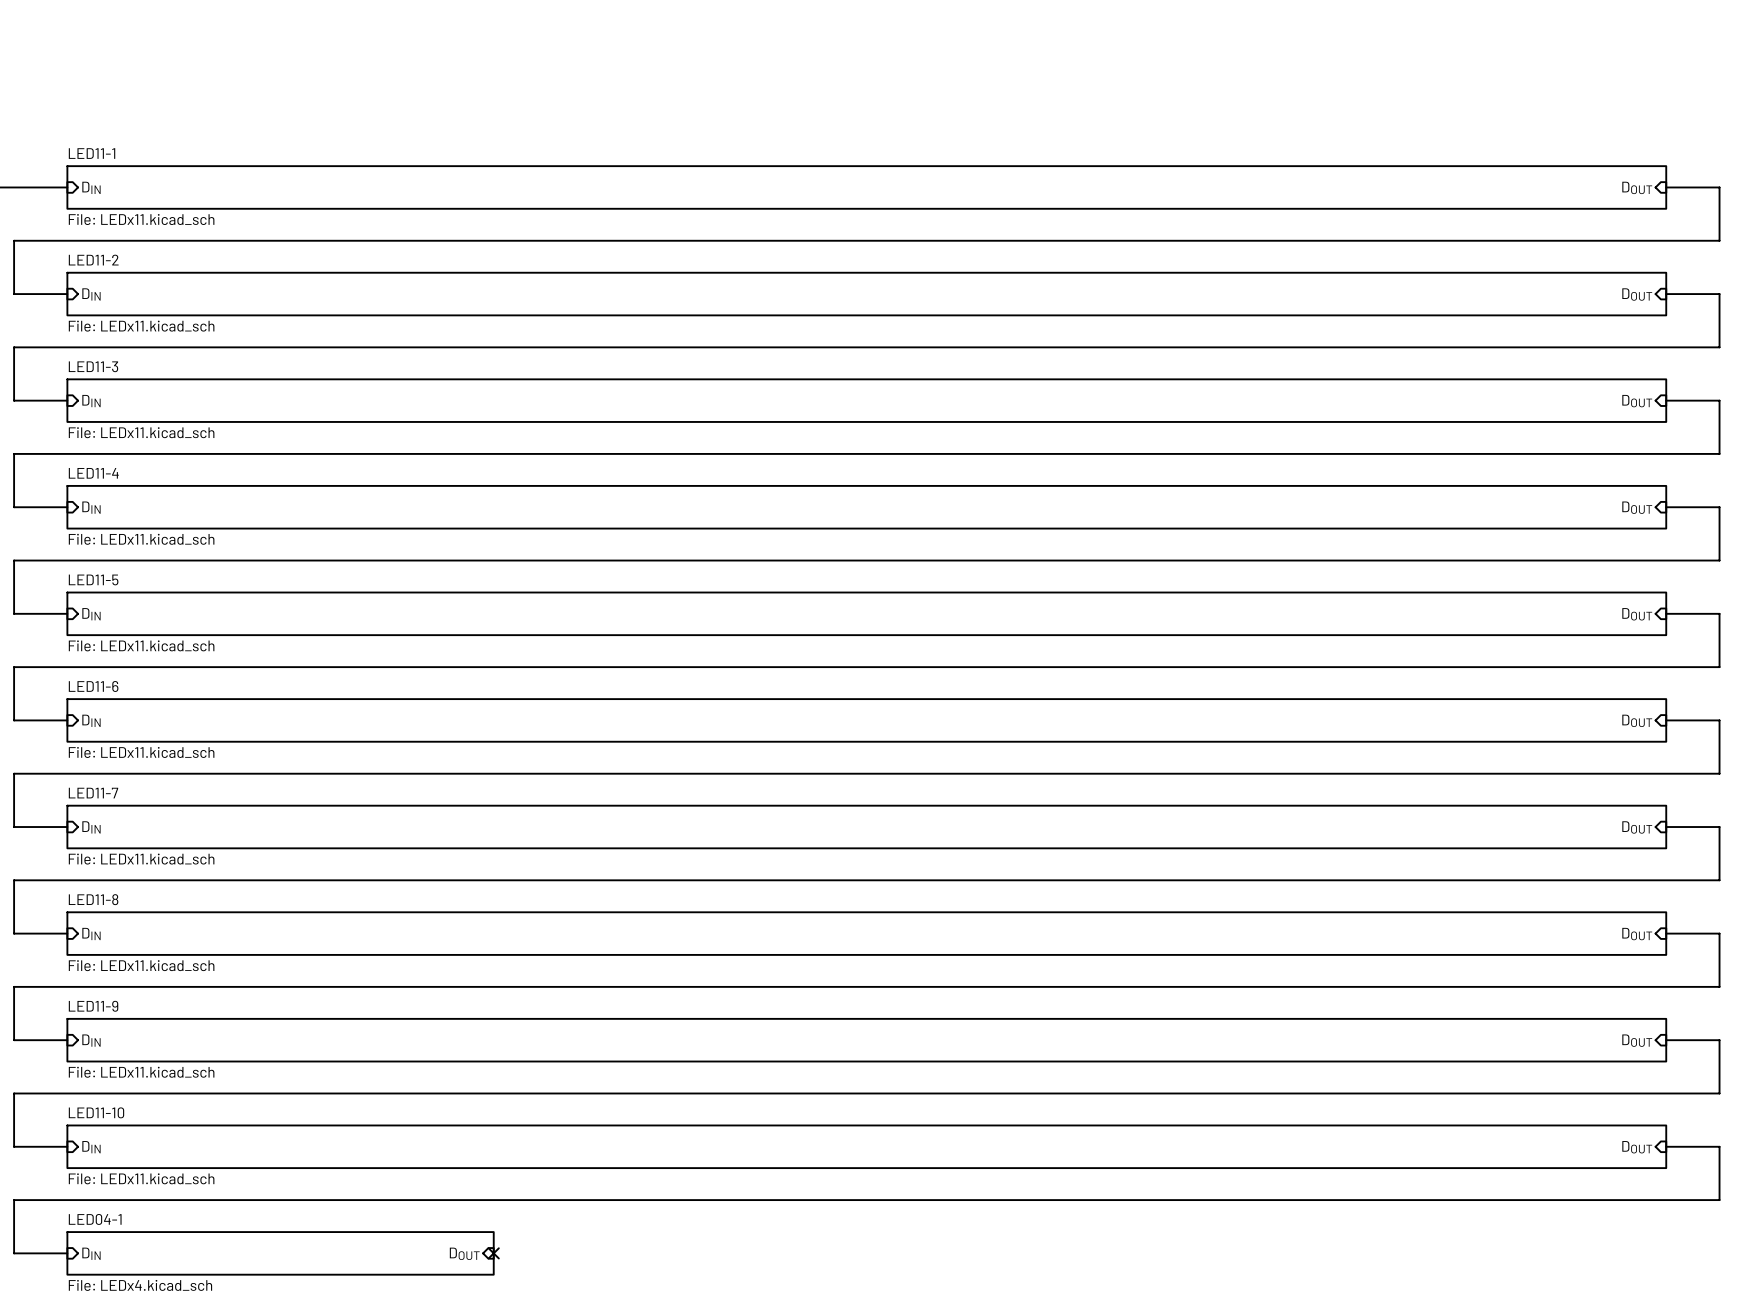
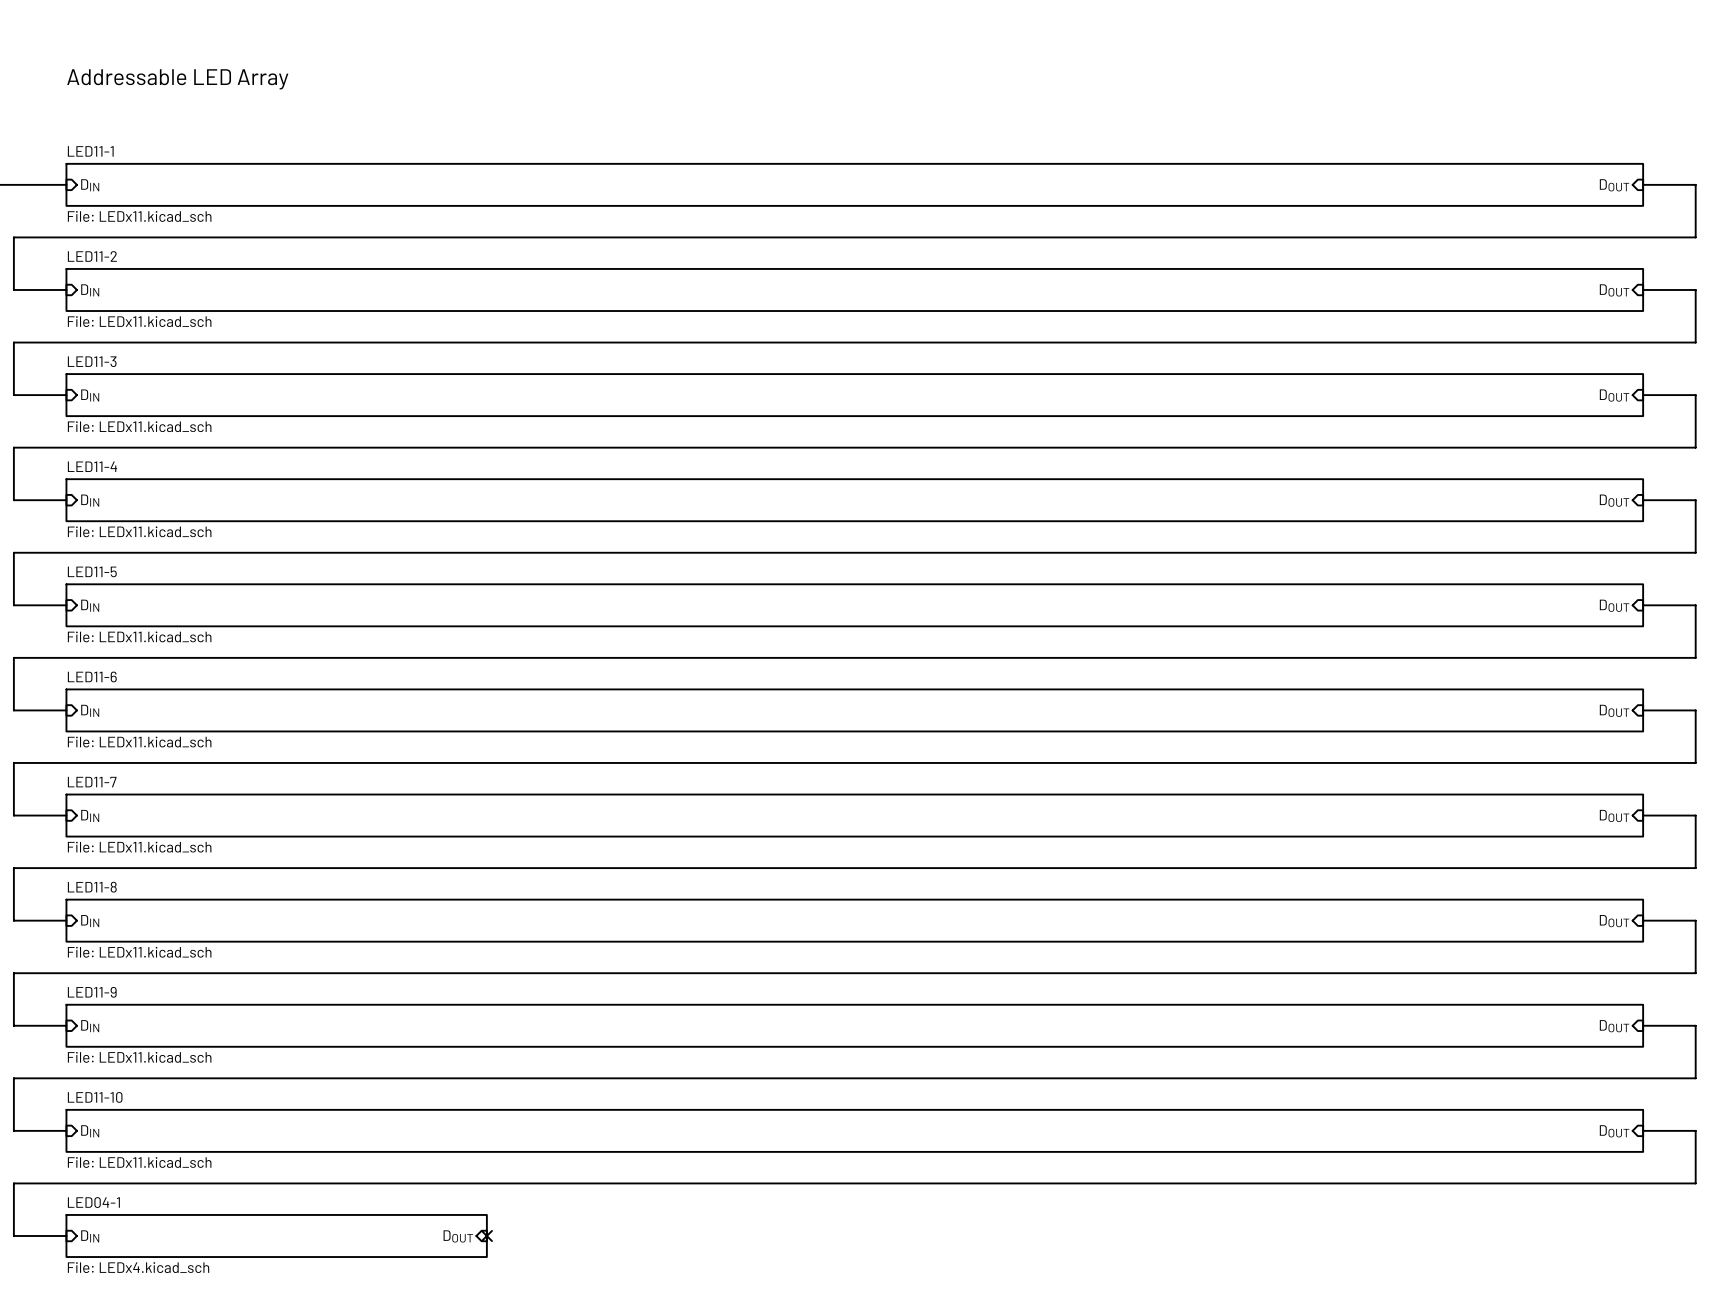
text: none -> Addressable LED Array (177, 79)

